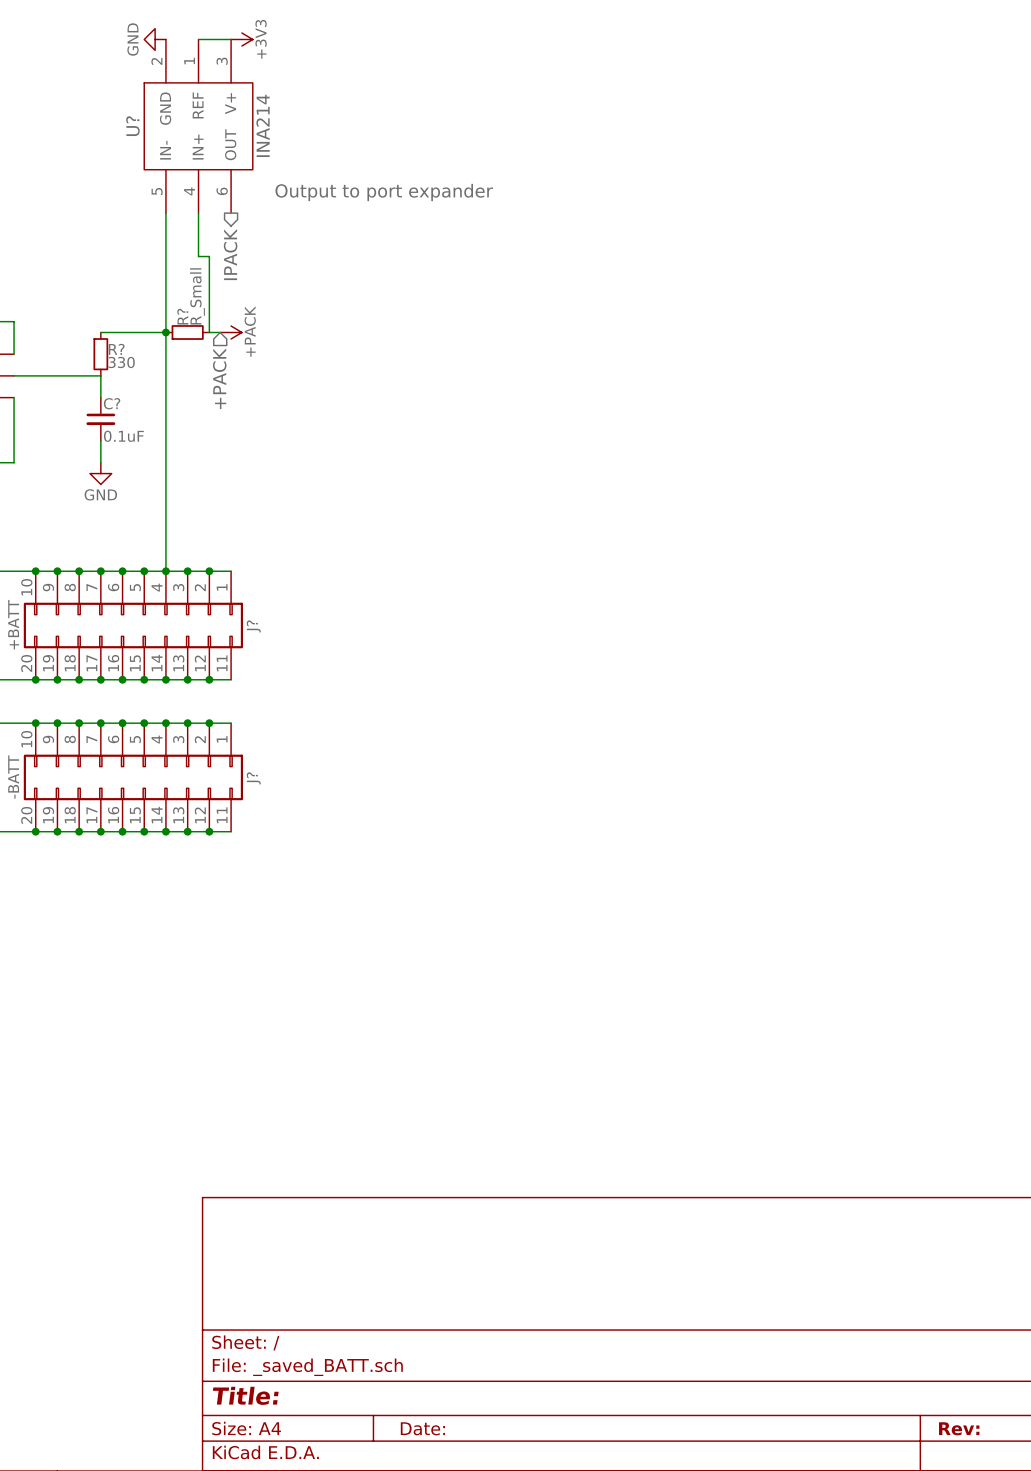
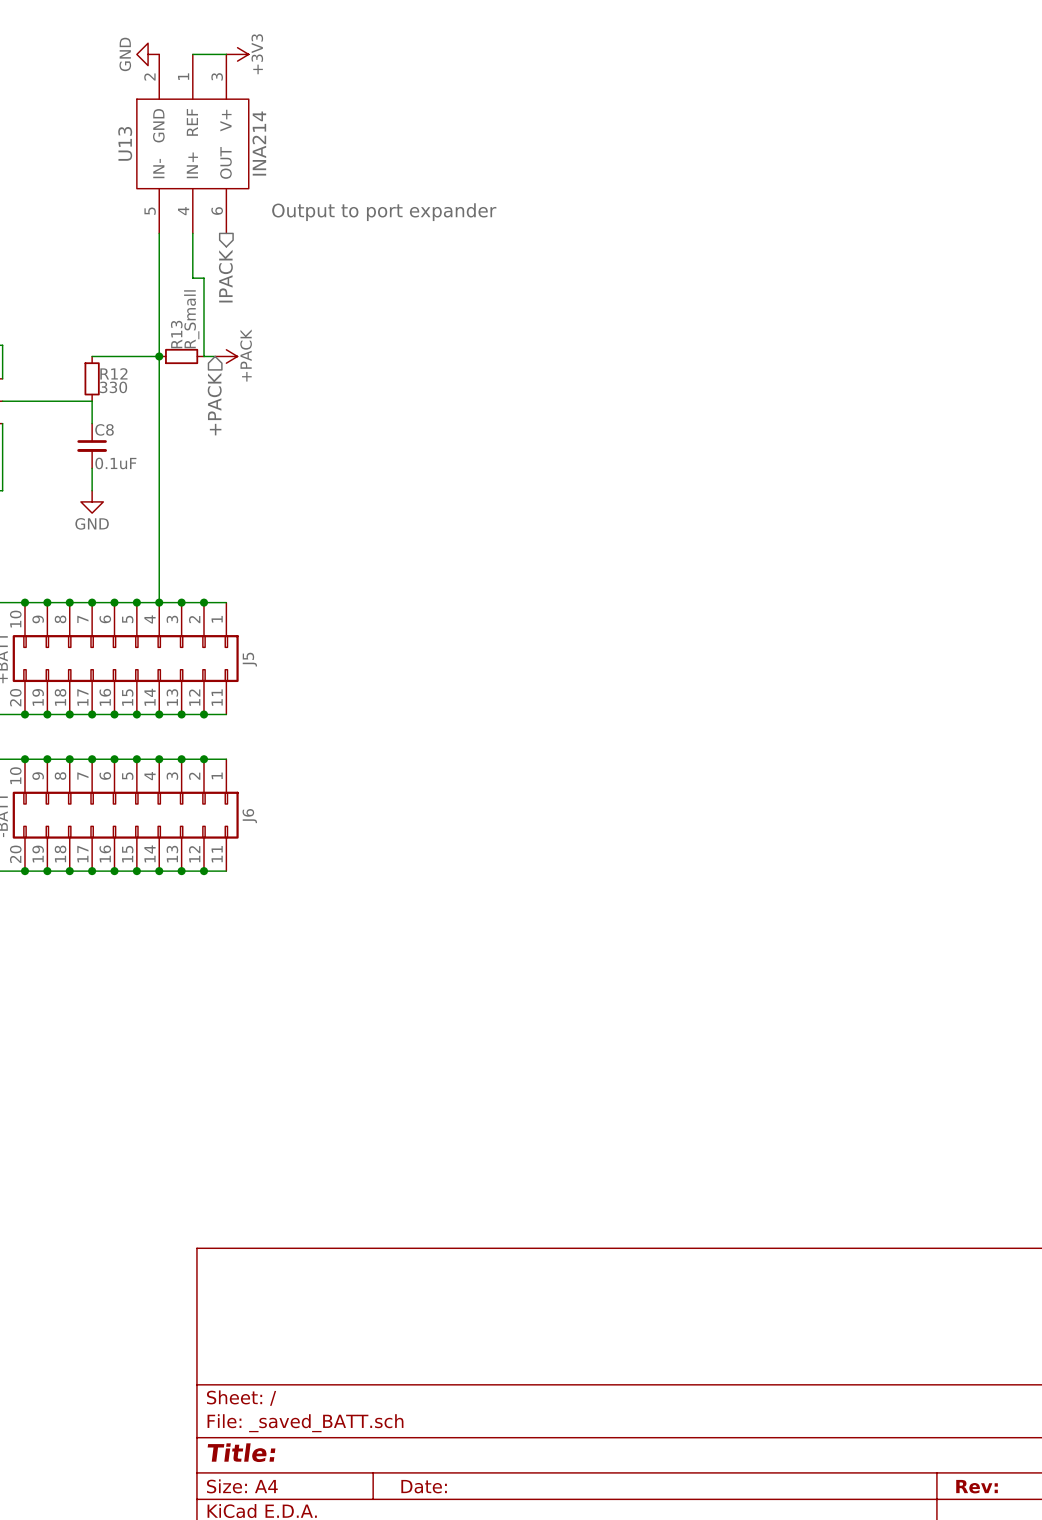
U? name: U? (132, 126) -> U13 (125, 143)
R? name: R? (182, 316) -> R13 (176, 334)
R? name: R? (116, 349) -> R12 (113, 373)
C? name: C? (112, 403) -> C8 (104, 429)
J? name: J? (253, 626) -> J5 (249, 659)
J? name: J? (253, 778) -> J6 (249, 816)

